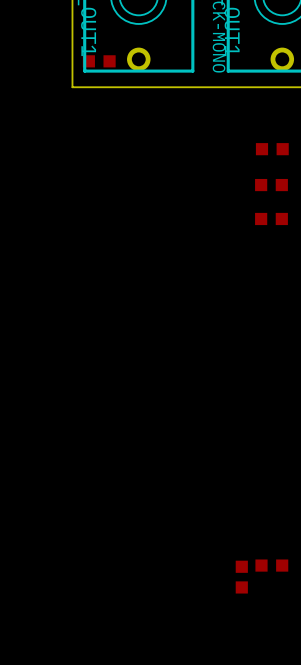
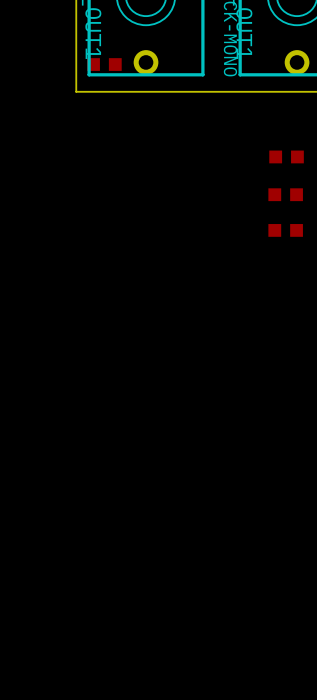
part: (271, 565) -> none
part: (241, 577) -> none

